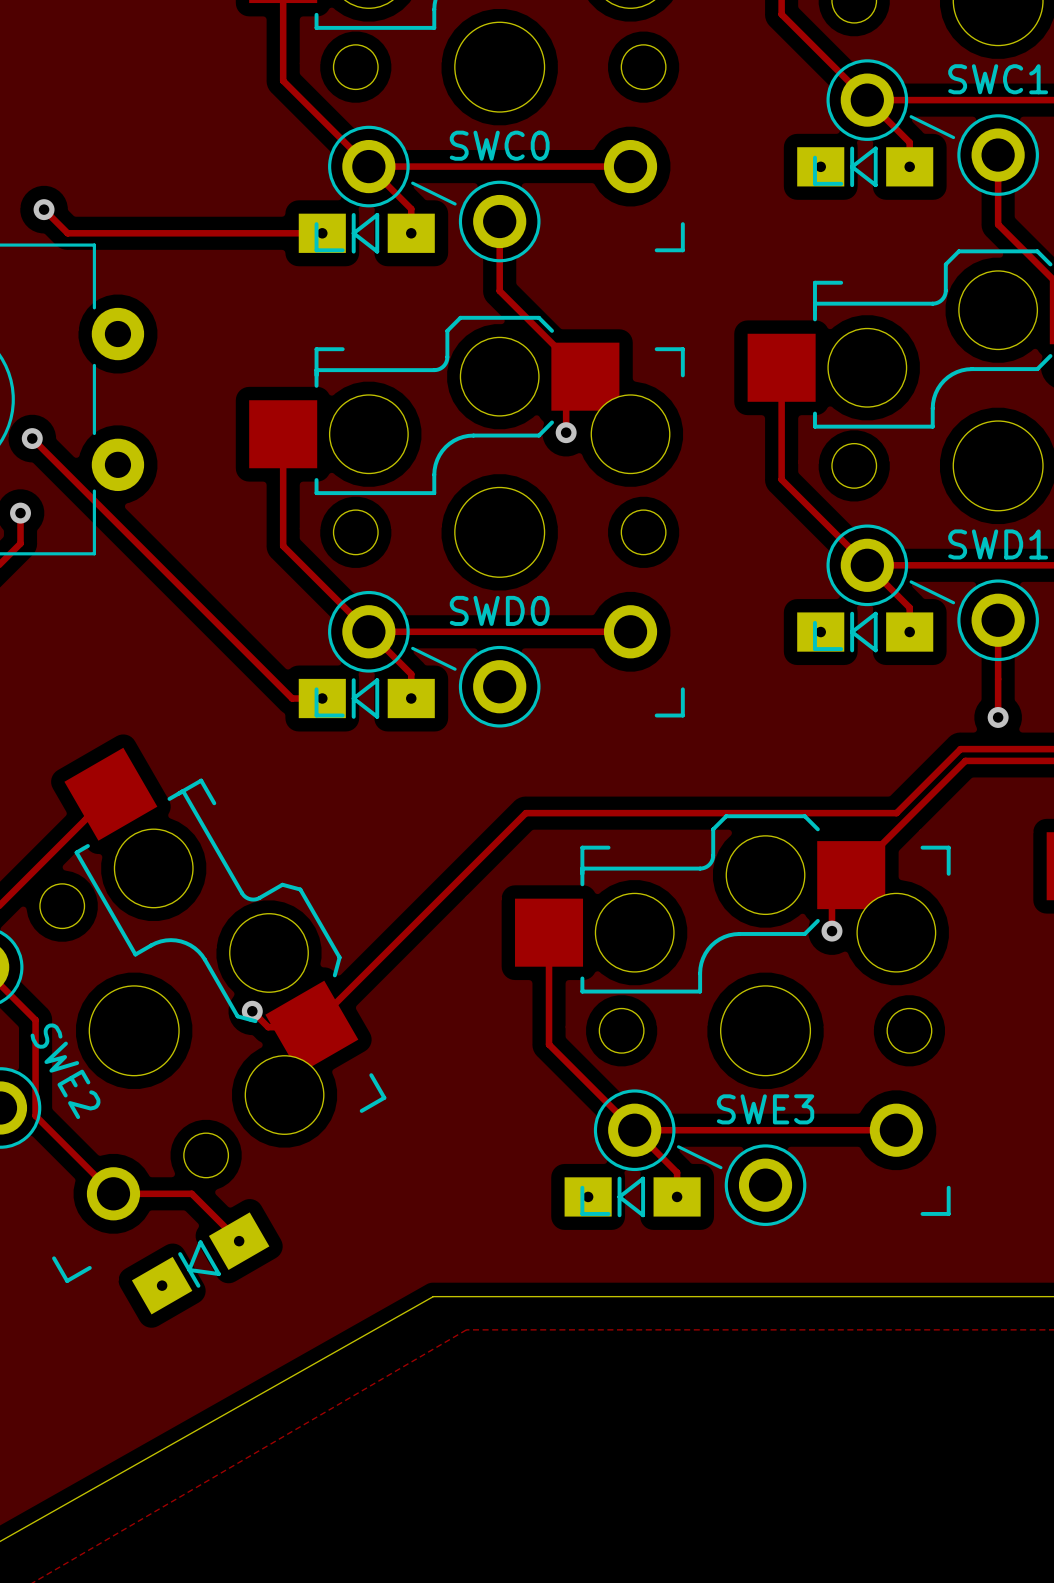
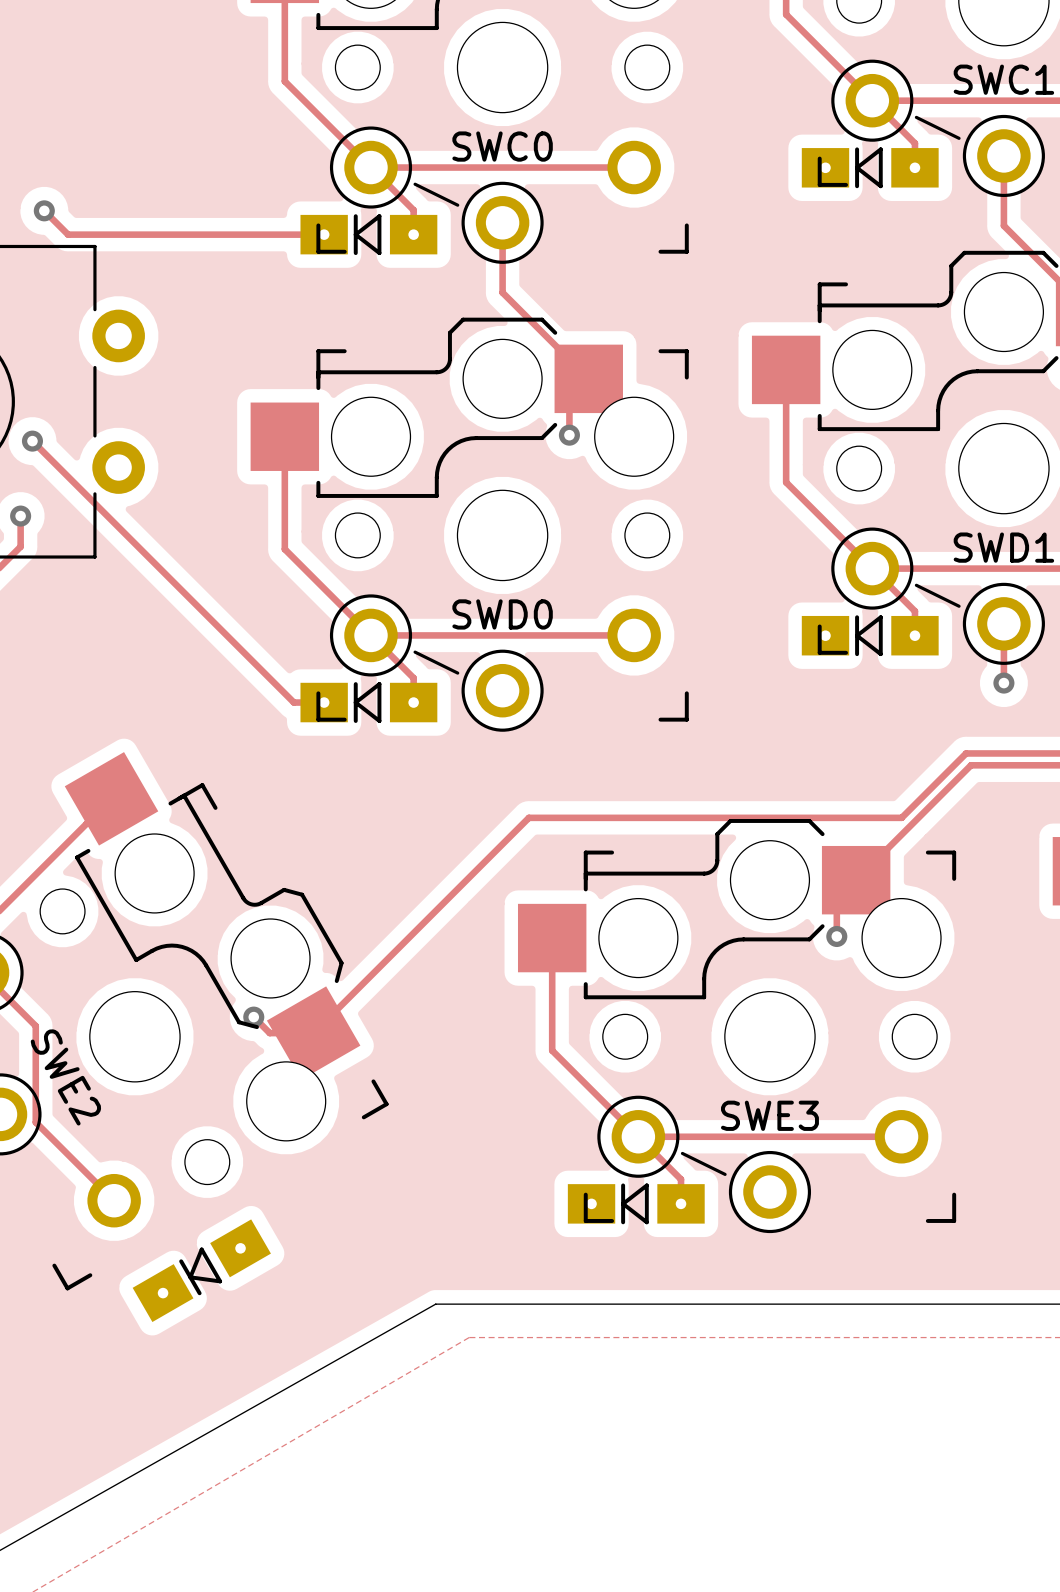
track: (998, 679) (998, 717) -> none
via position: (998, 717) -> (1003, 683)
track: (113, 1193) (191, 1193) (239, 1241) -> none

